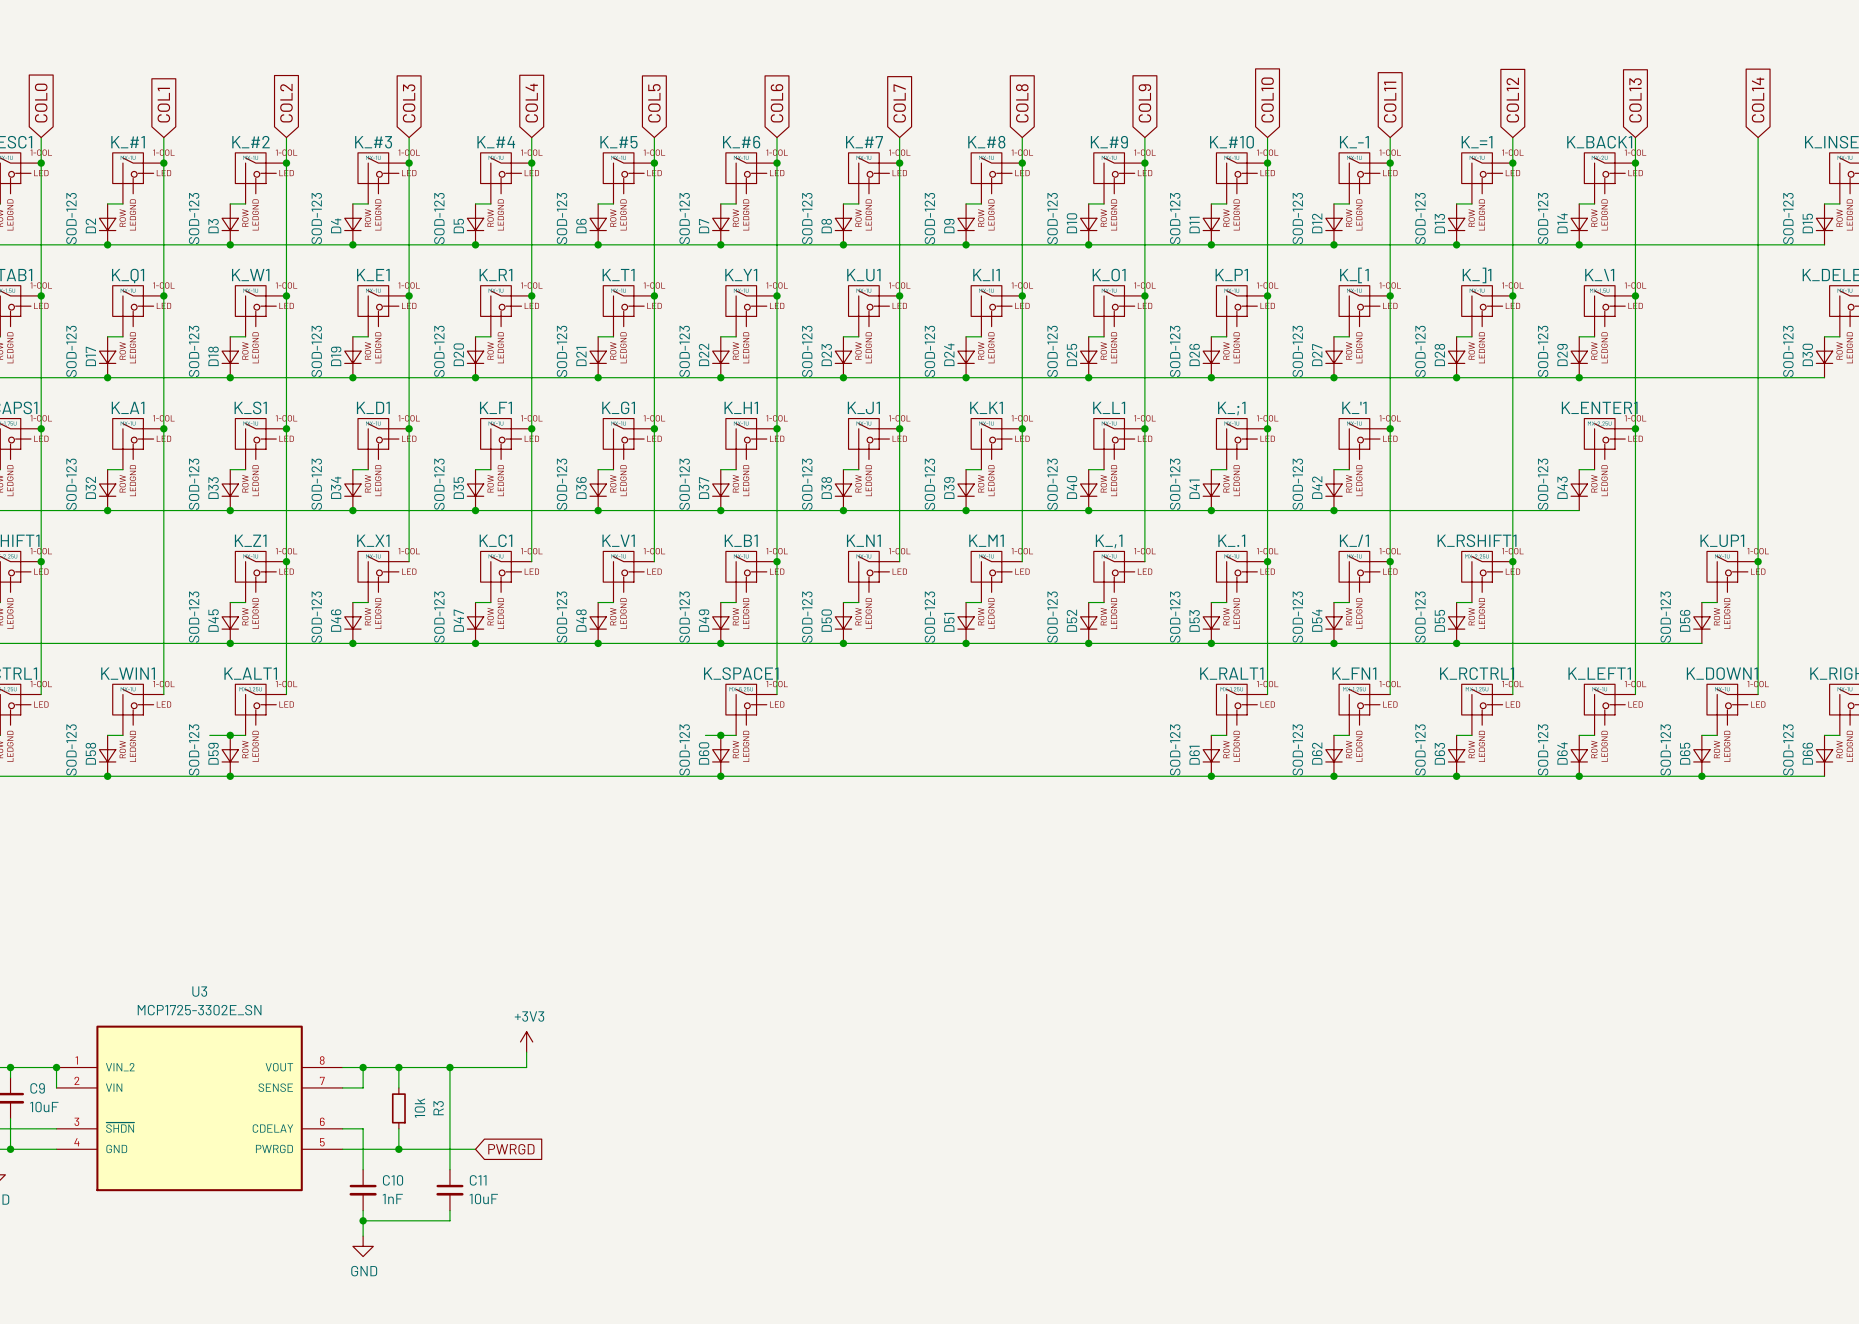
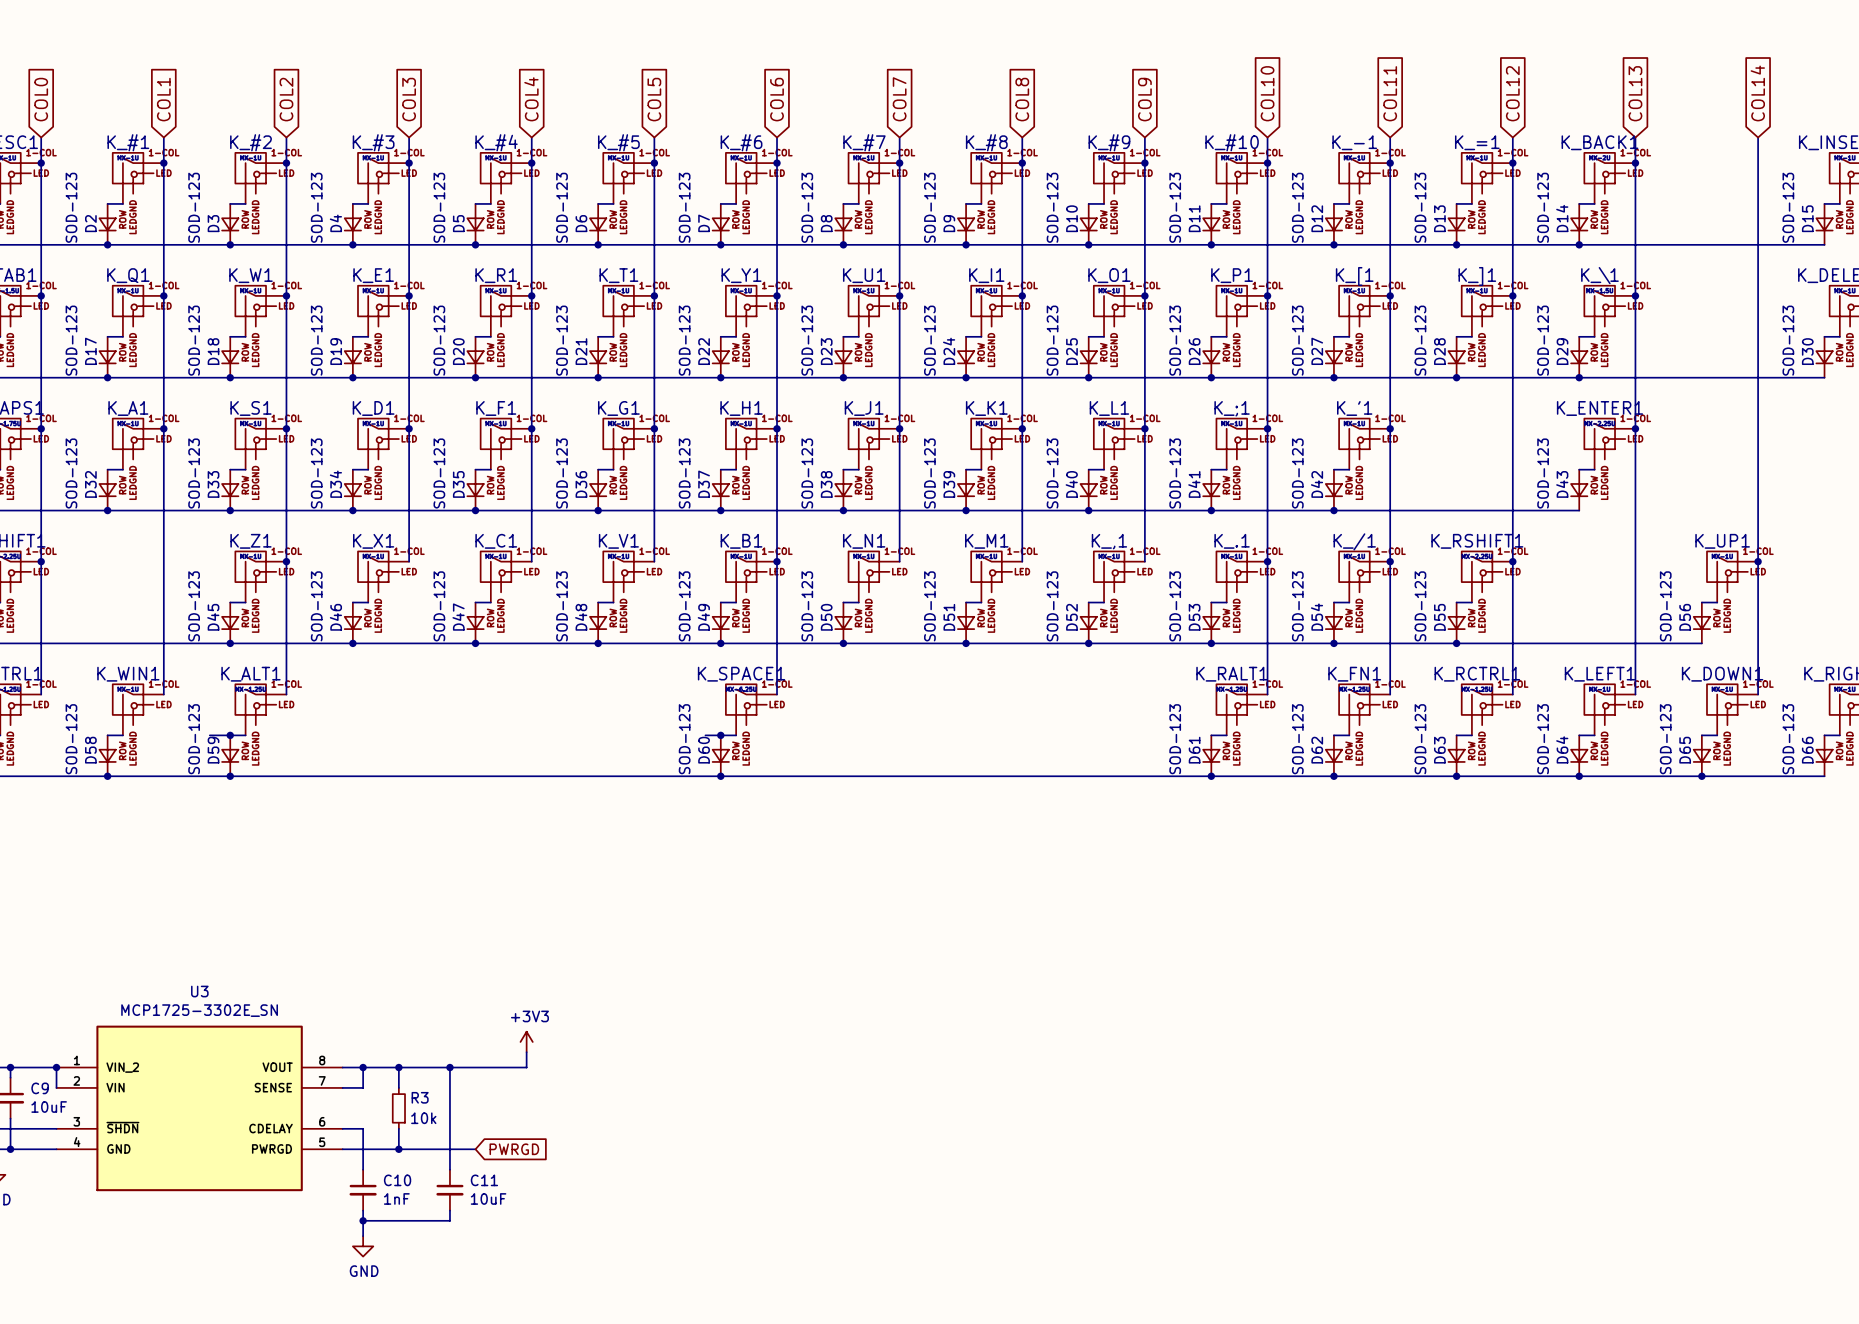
R3 value rotation: 0° (419, 1108) -> 90° clockwise (423, 1118)
R3 name rotation: 0° (438, 1108) -> 90° clockwise (420, 1097)

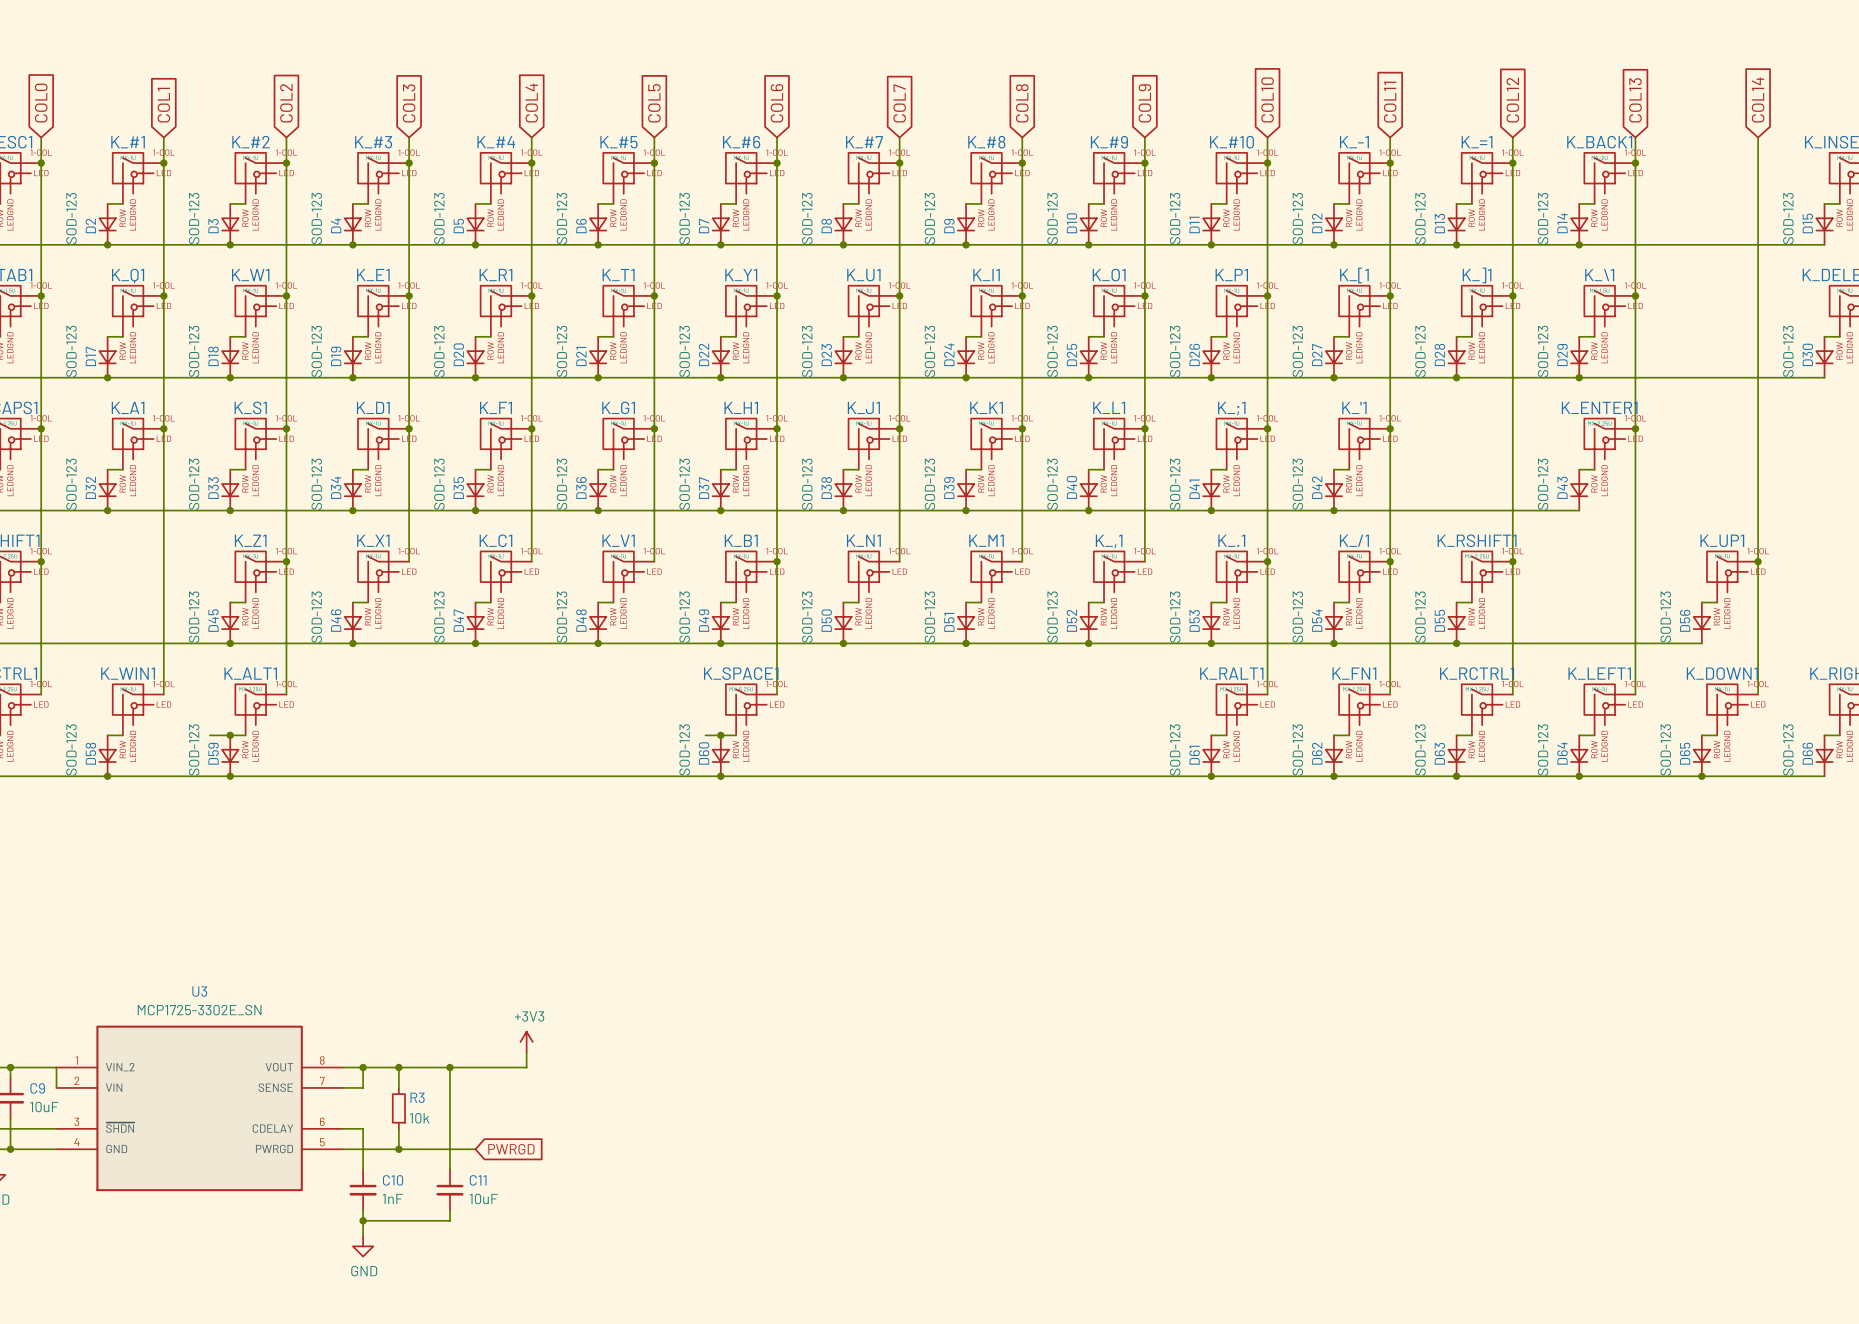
junction: (56, 1067) -> none

